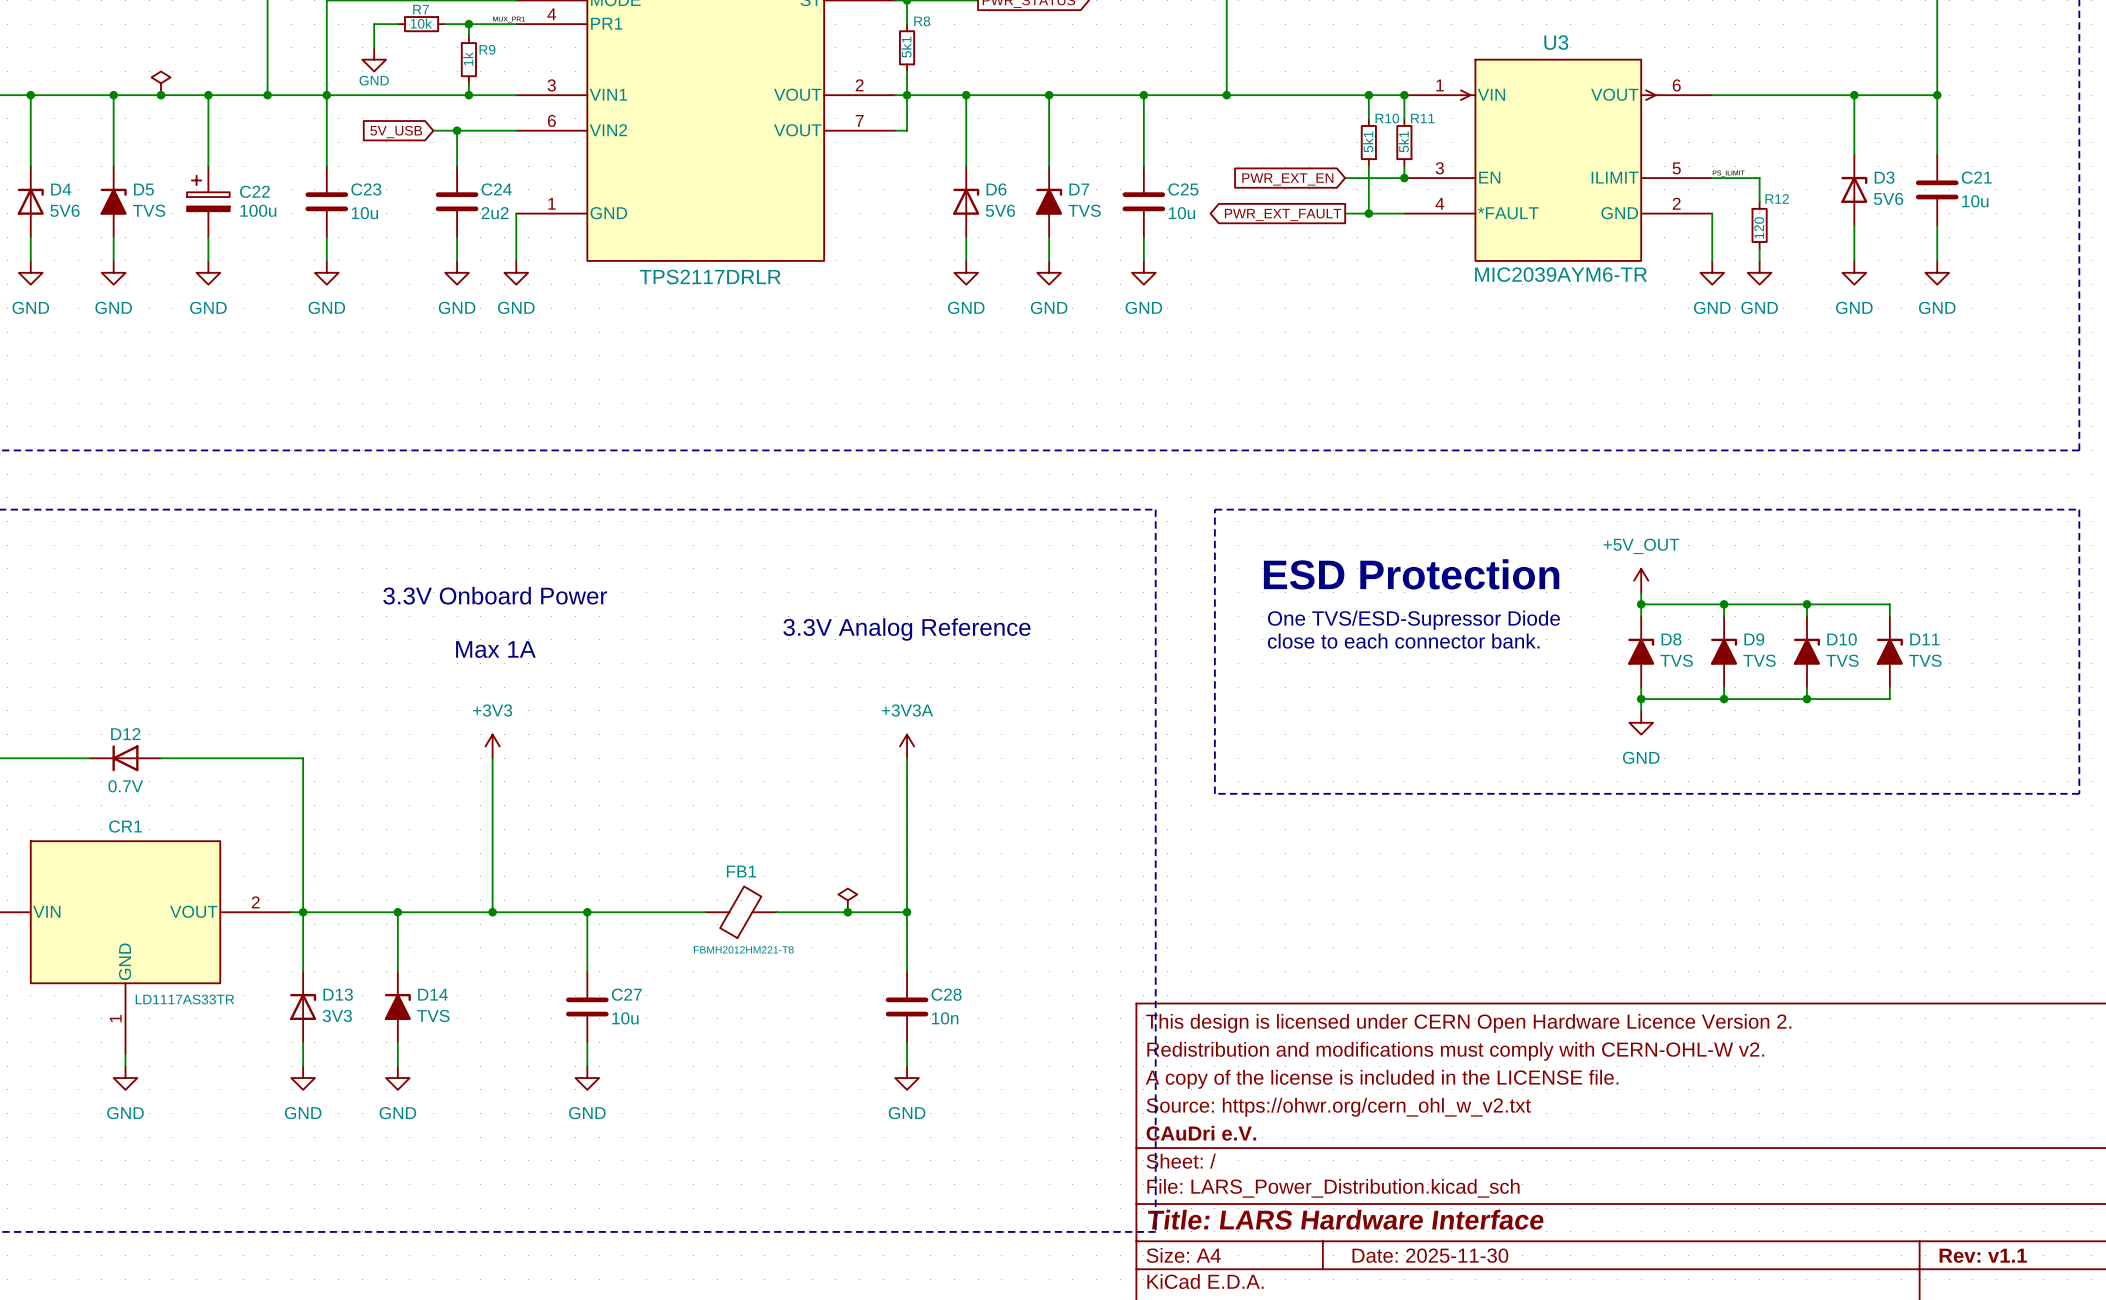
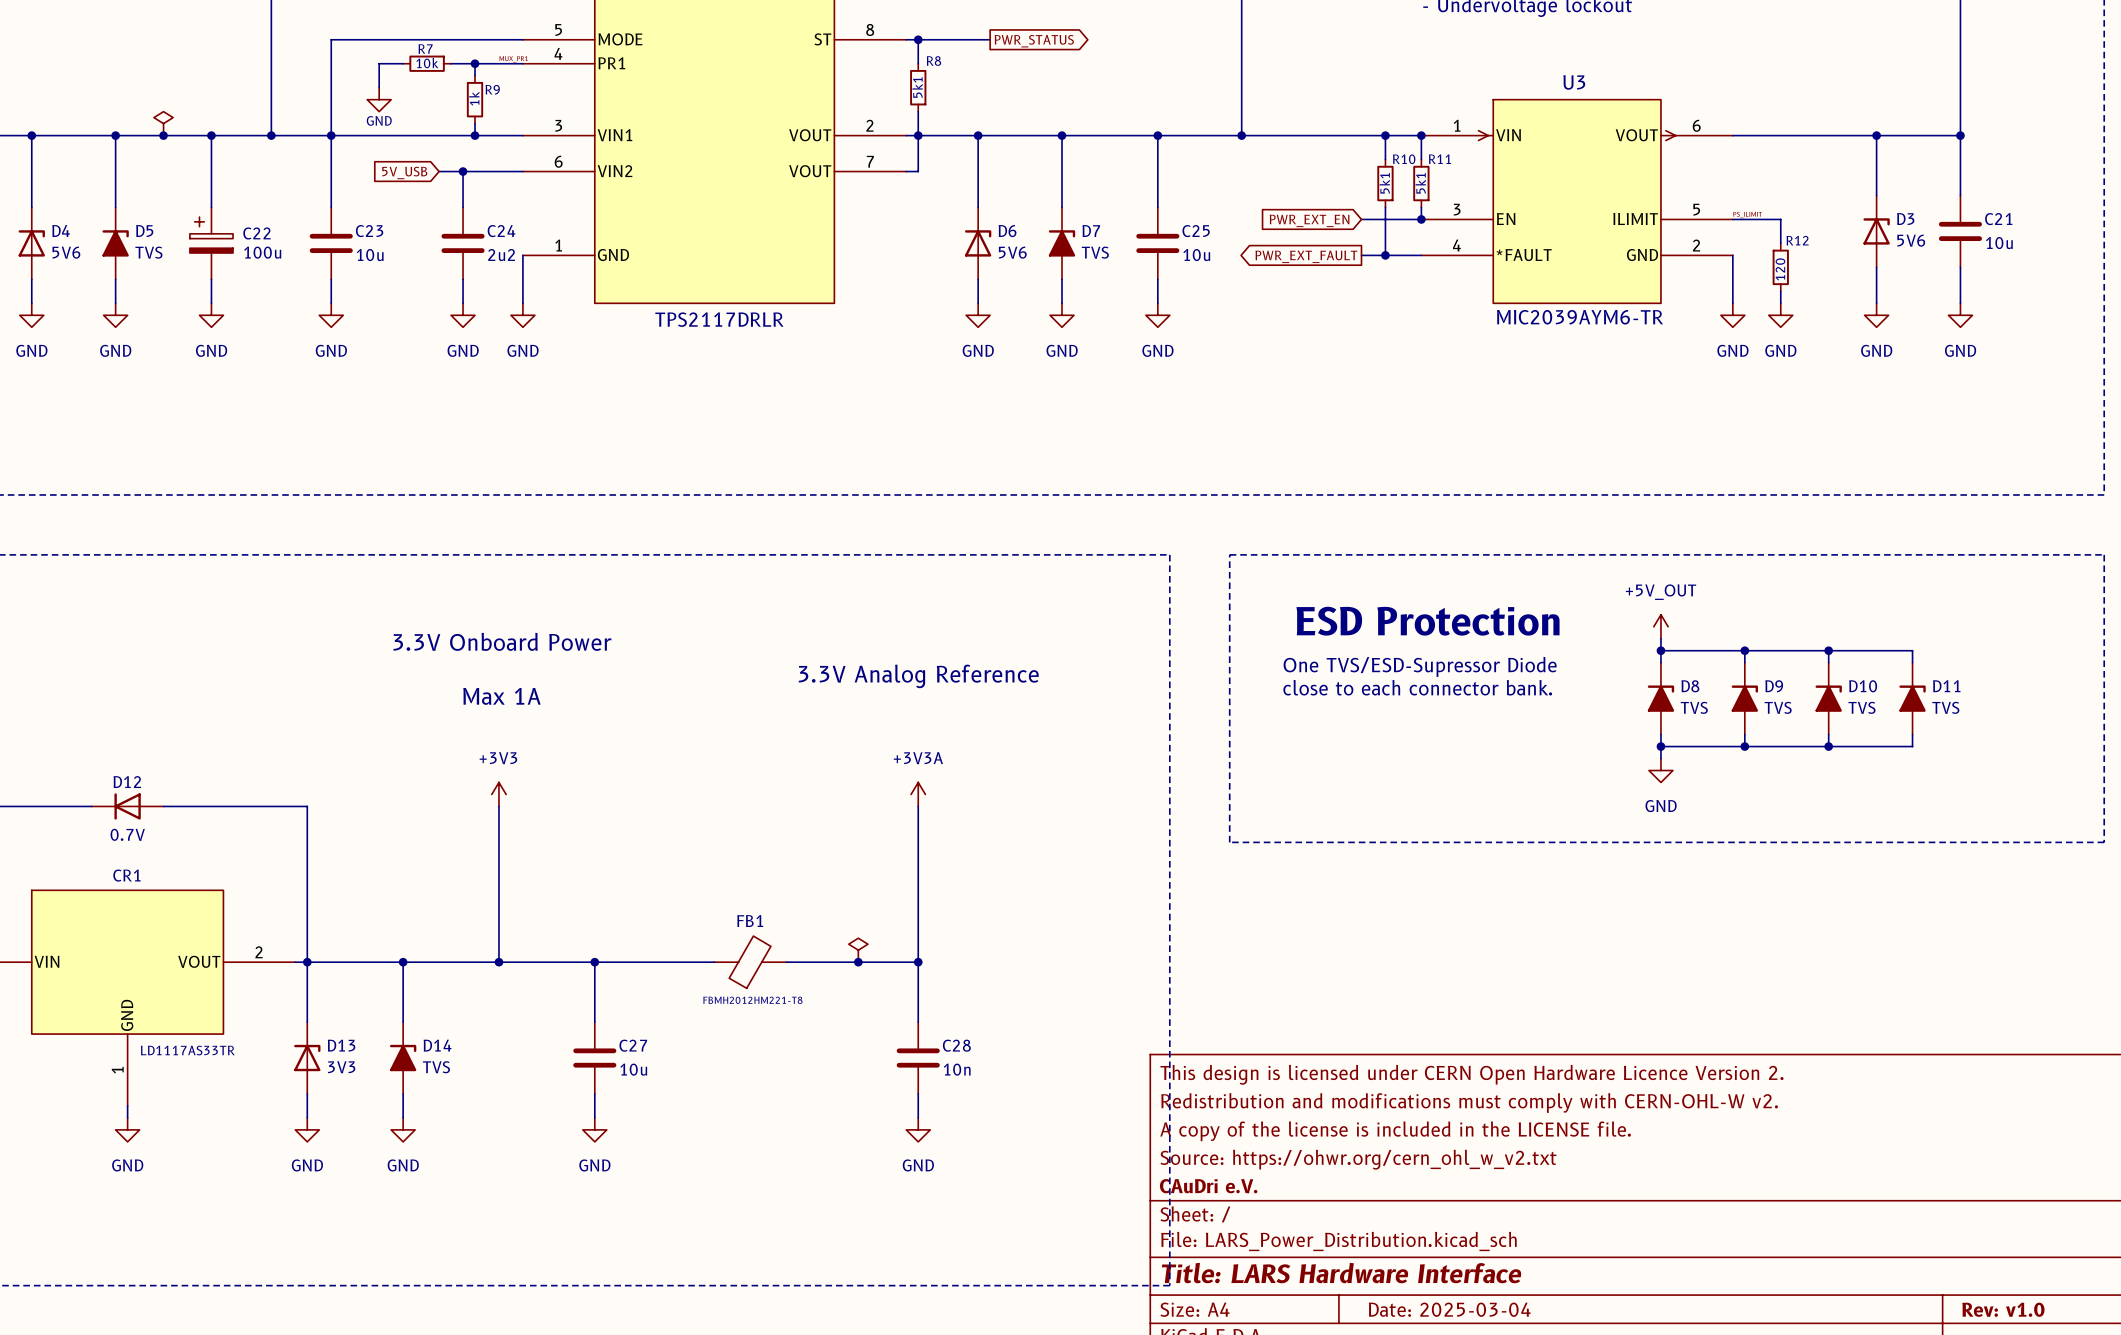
title block: Date: 2025-11-30 (1430, 1255) -> Date: 2025-03-04 (1449, 1309)
title block: Rev: v1.1 (1983, 1255) -> Rev: v1.0 (2003, 1309)

